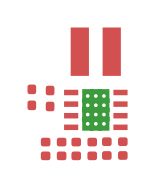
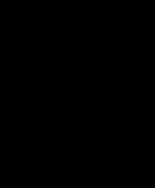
part: (95, 51) -> none
part: (31, 97) -> none
part: (50, 98) -> none
part: (95, 109) -> none
part: (114, 141) -> none
part: (53, 142) -> none
part: (84, 142) -> none
part: (53, 155) -> none
part: (84, 155) -> none
part: (114, 155) -> none

